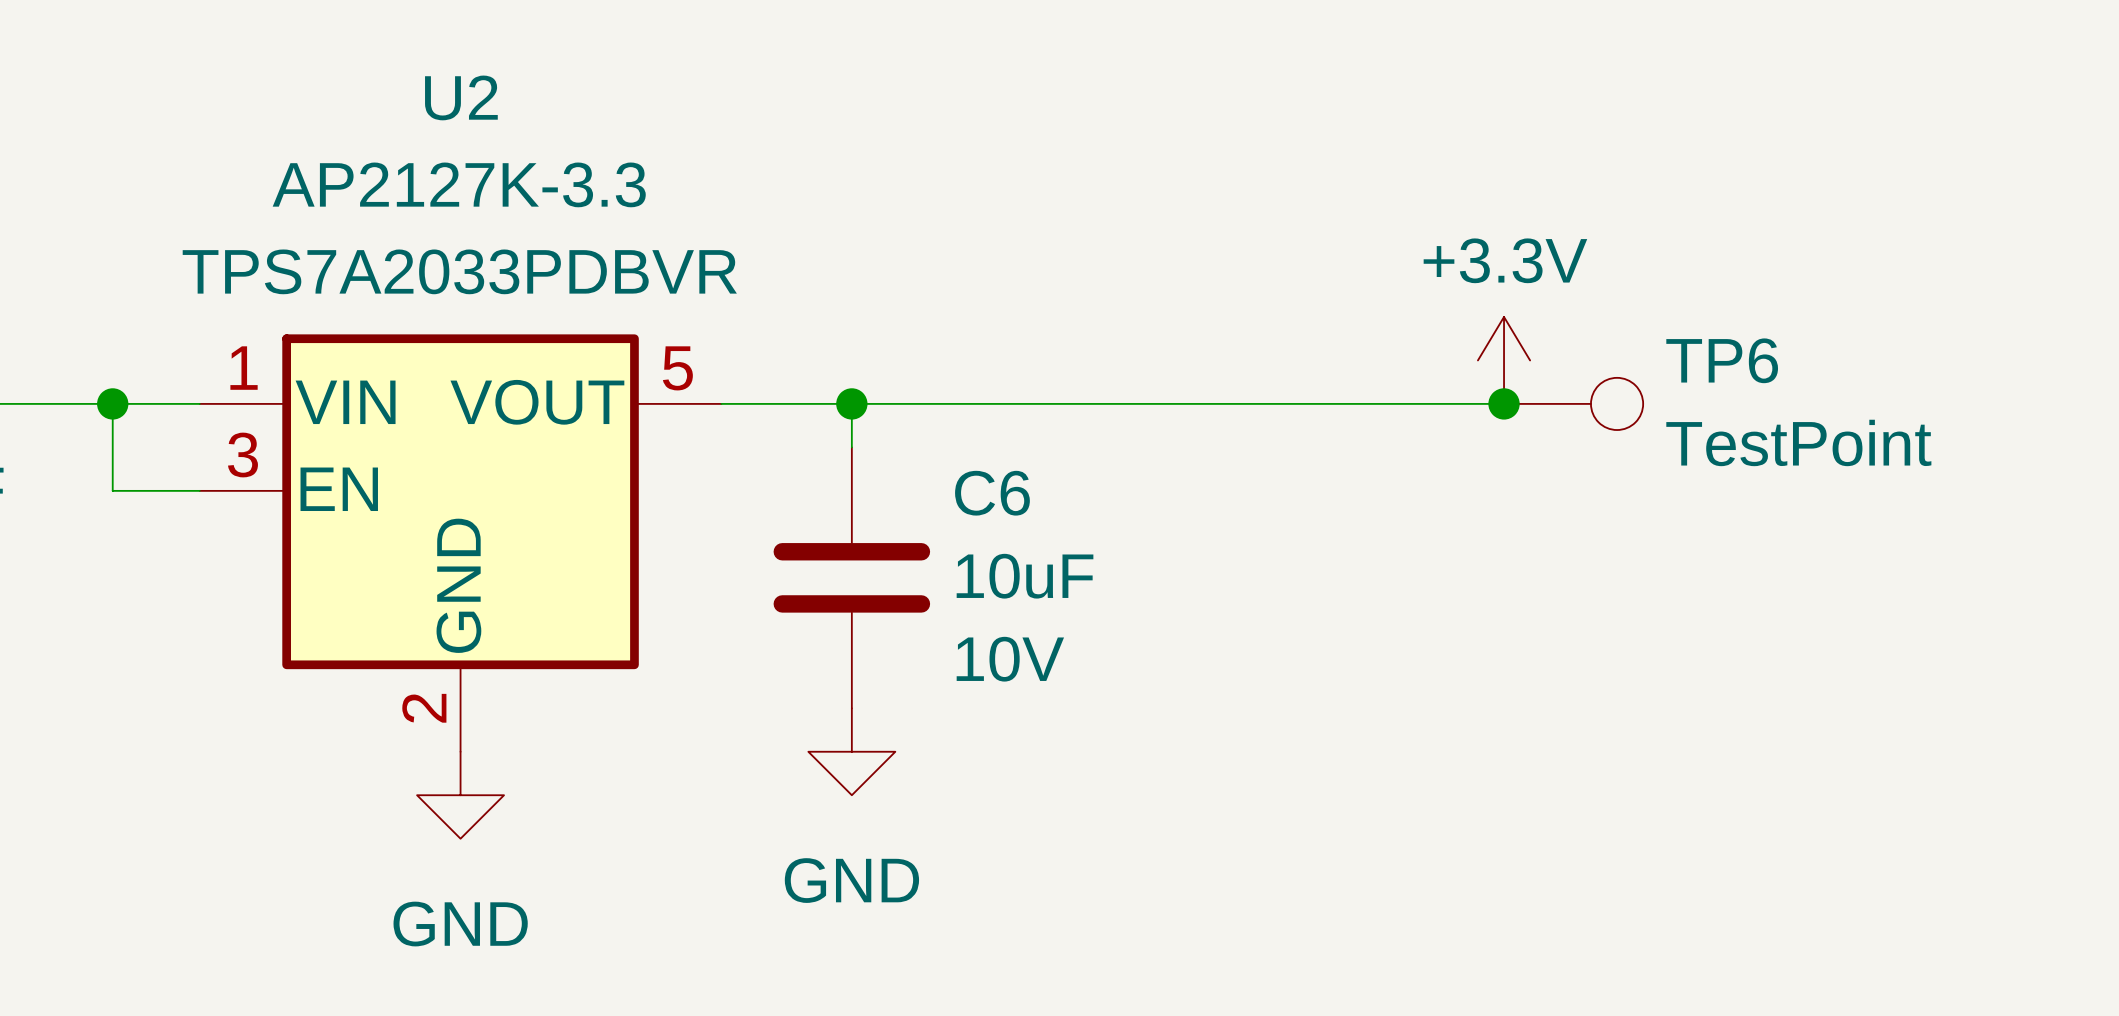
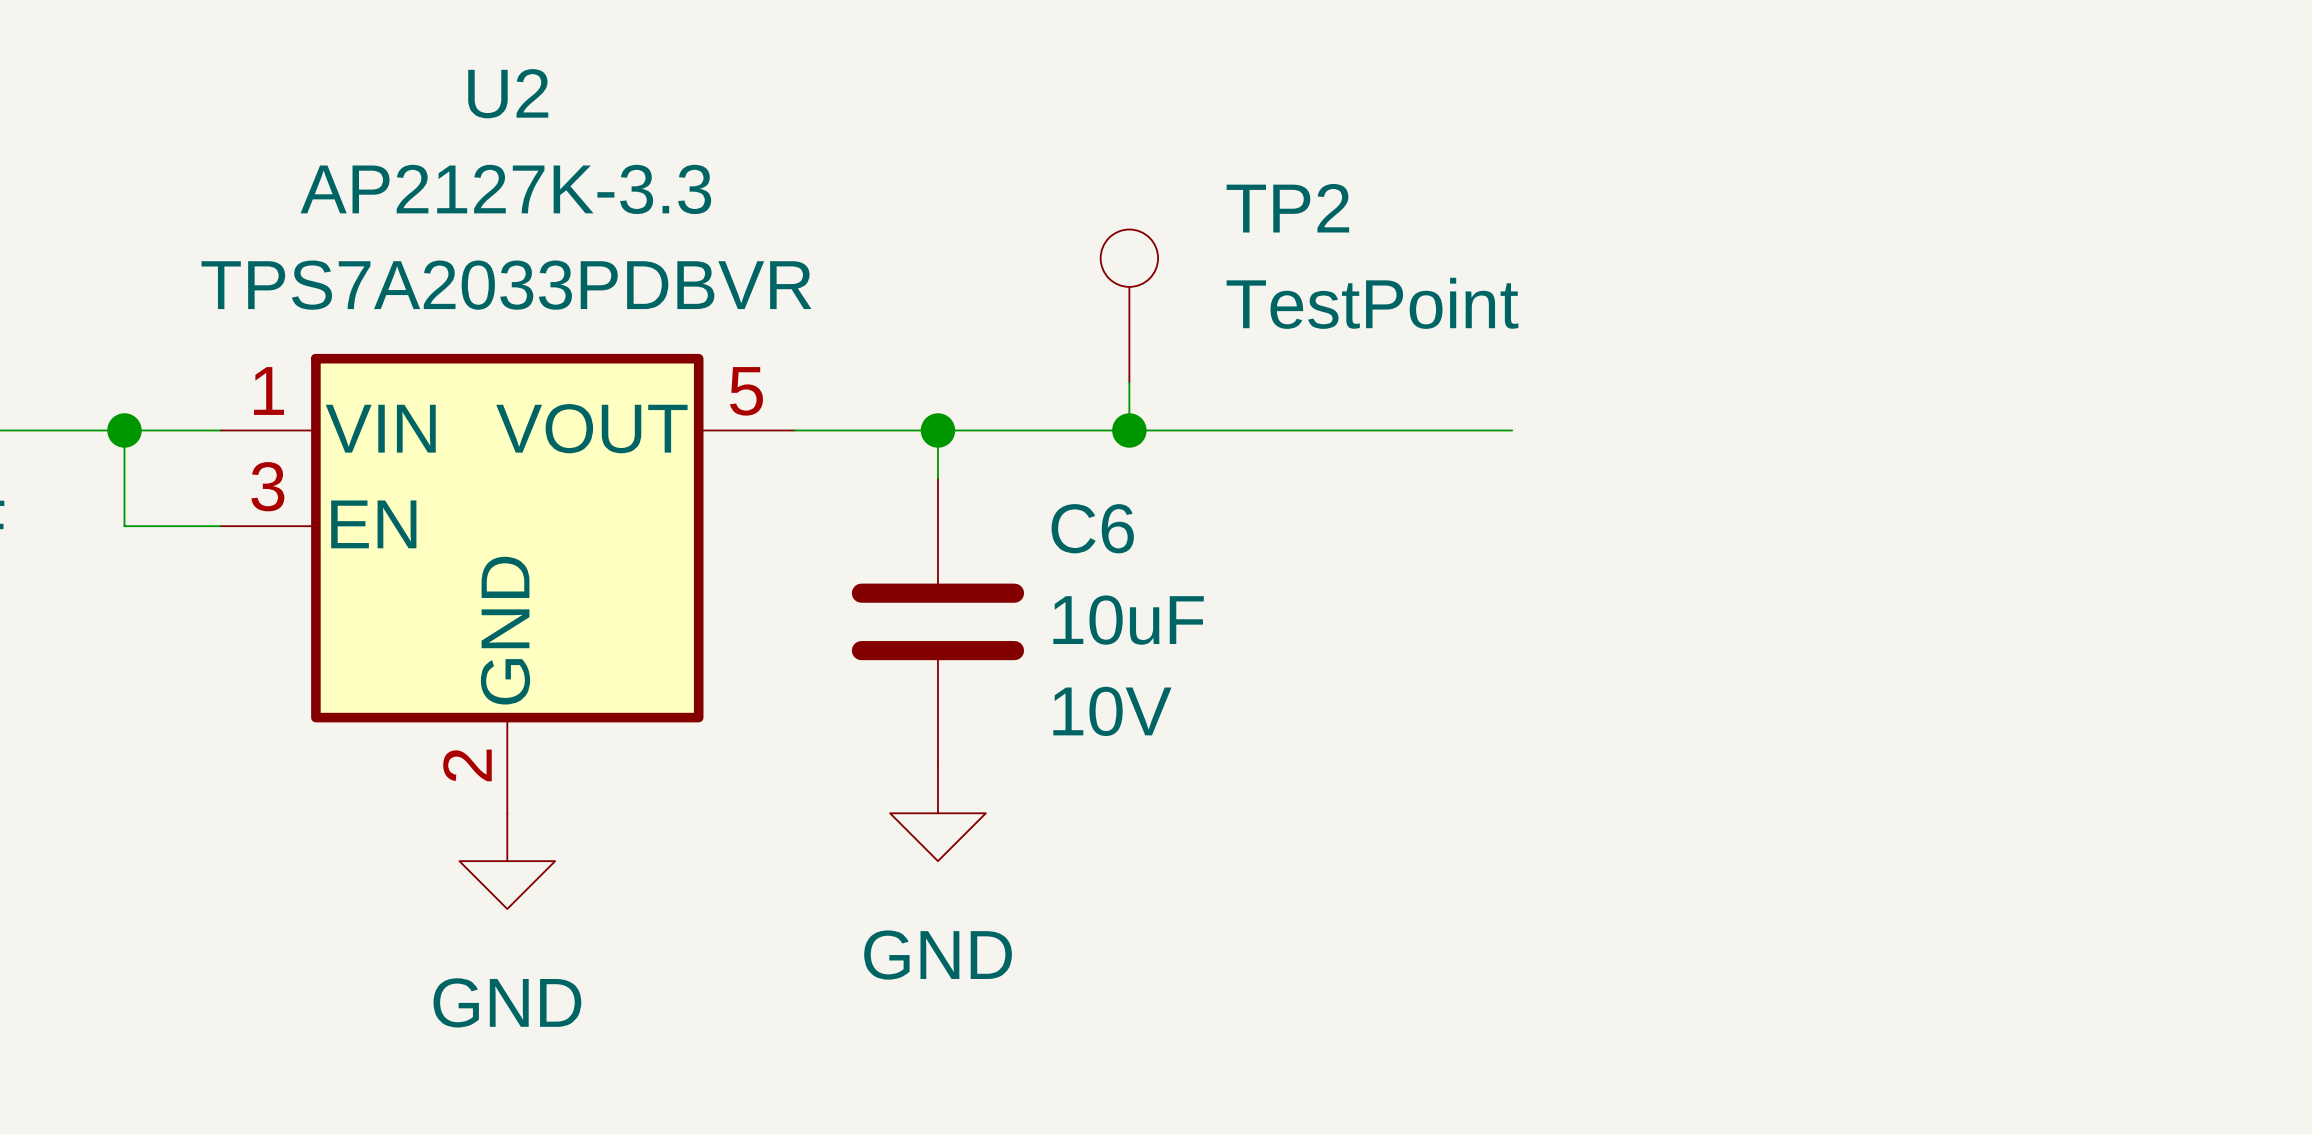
TP2: none -> TestPoint (1129, 306)
wire: none -> (1129, 382) (1129, 430)
power symbol: +3.3V (1504, 360) -> none
junction: none -> (1129, 430)
wire: (1373, 403) (1504, 403) -> none
junction: (1504, 403) -> none
TP6: TestPoint (1573, 403) -> none

